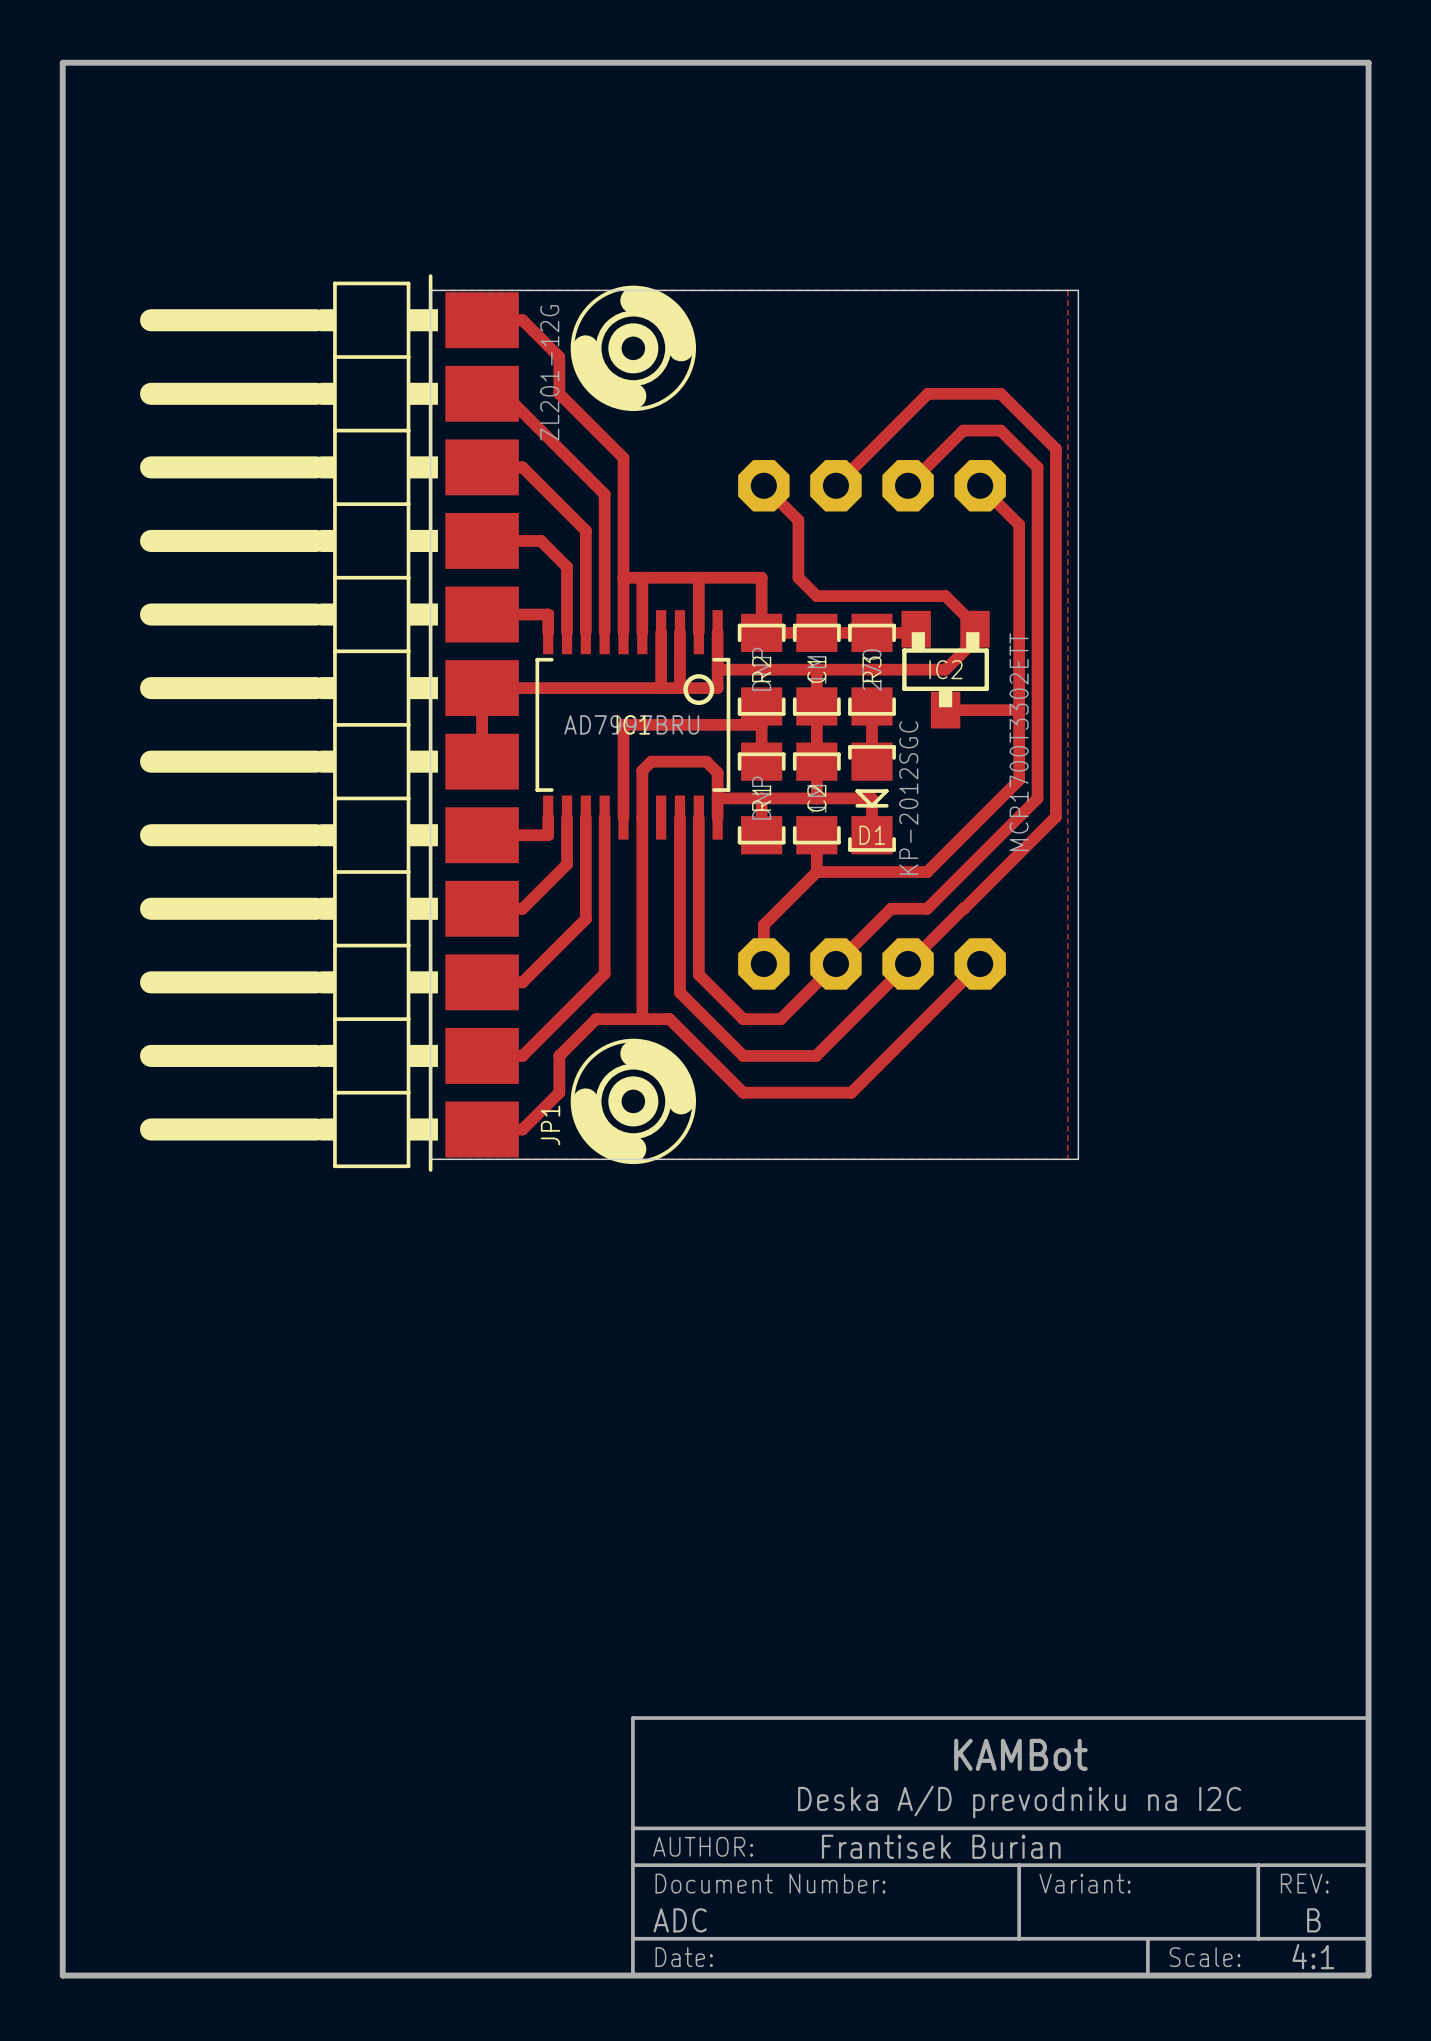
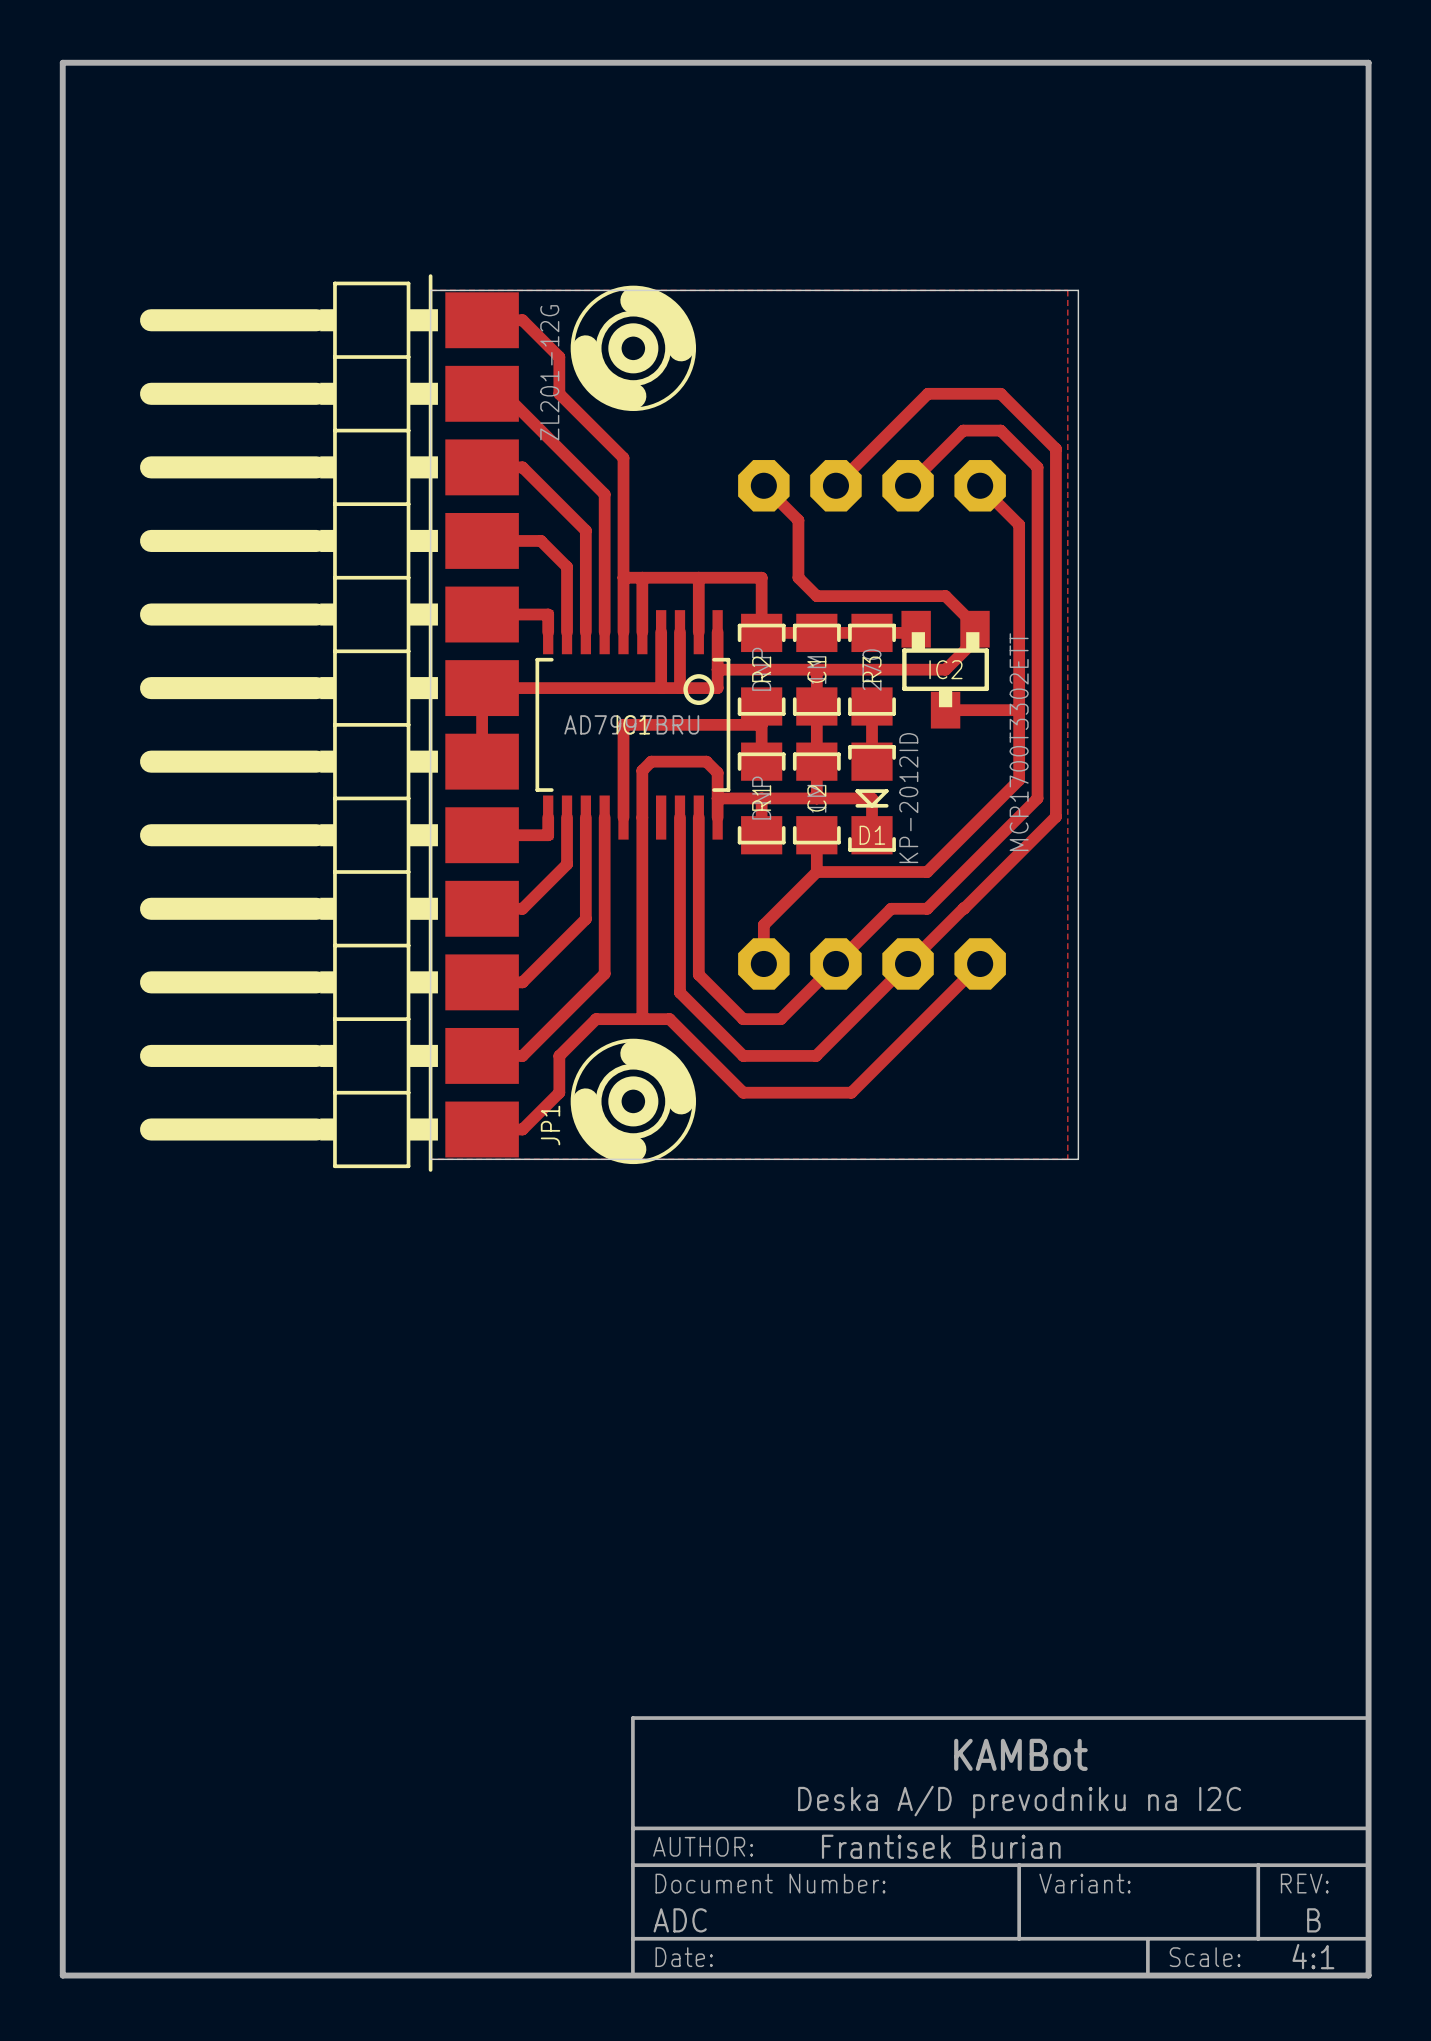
D1 value: KP-2012SGC (908, 798) -> KP-2012ID (908, 798)

